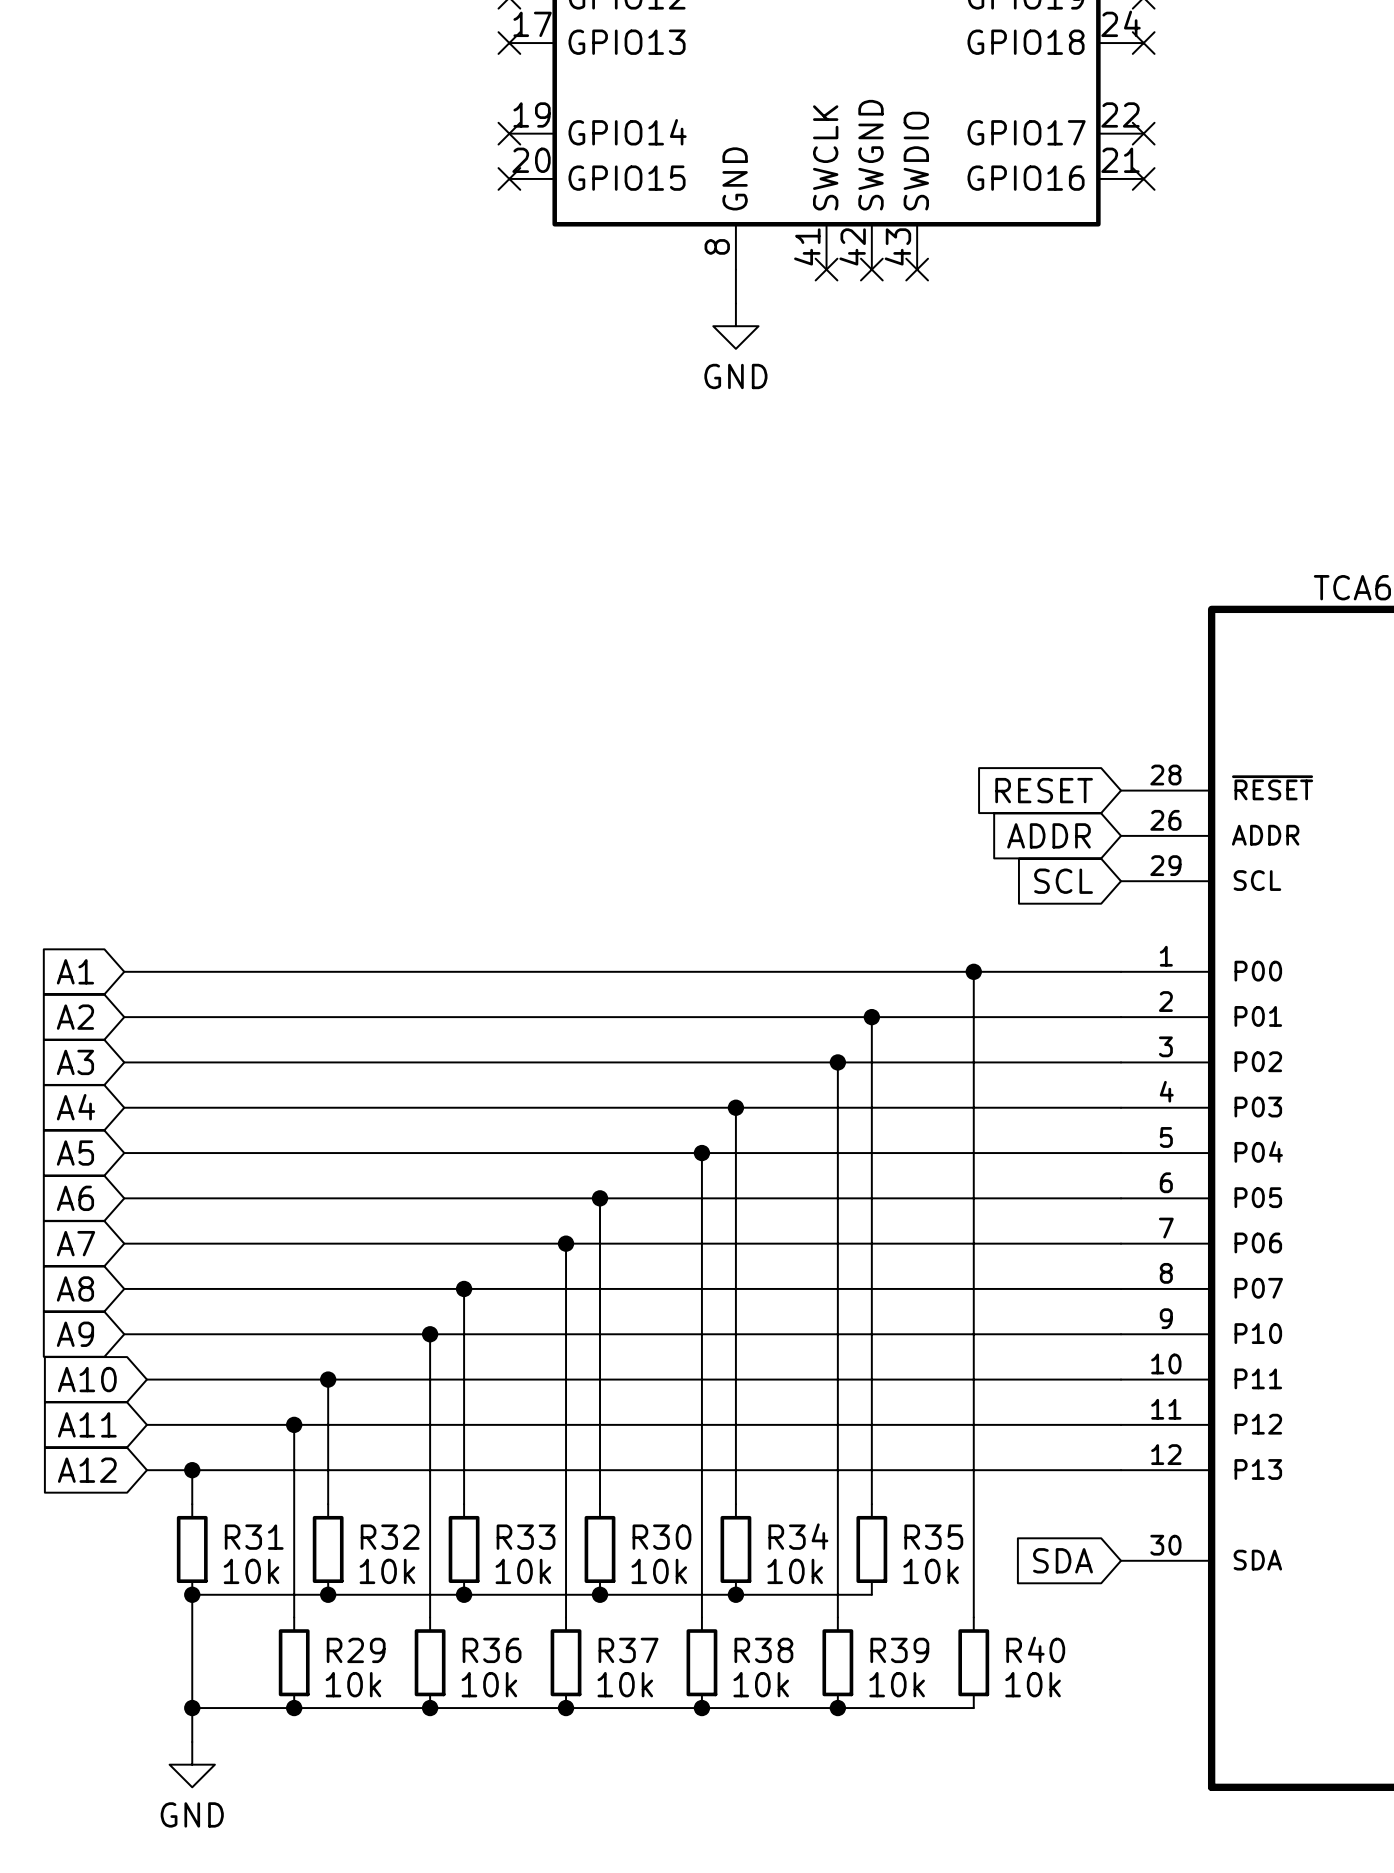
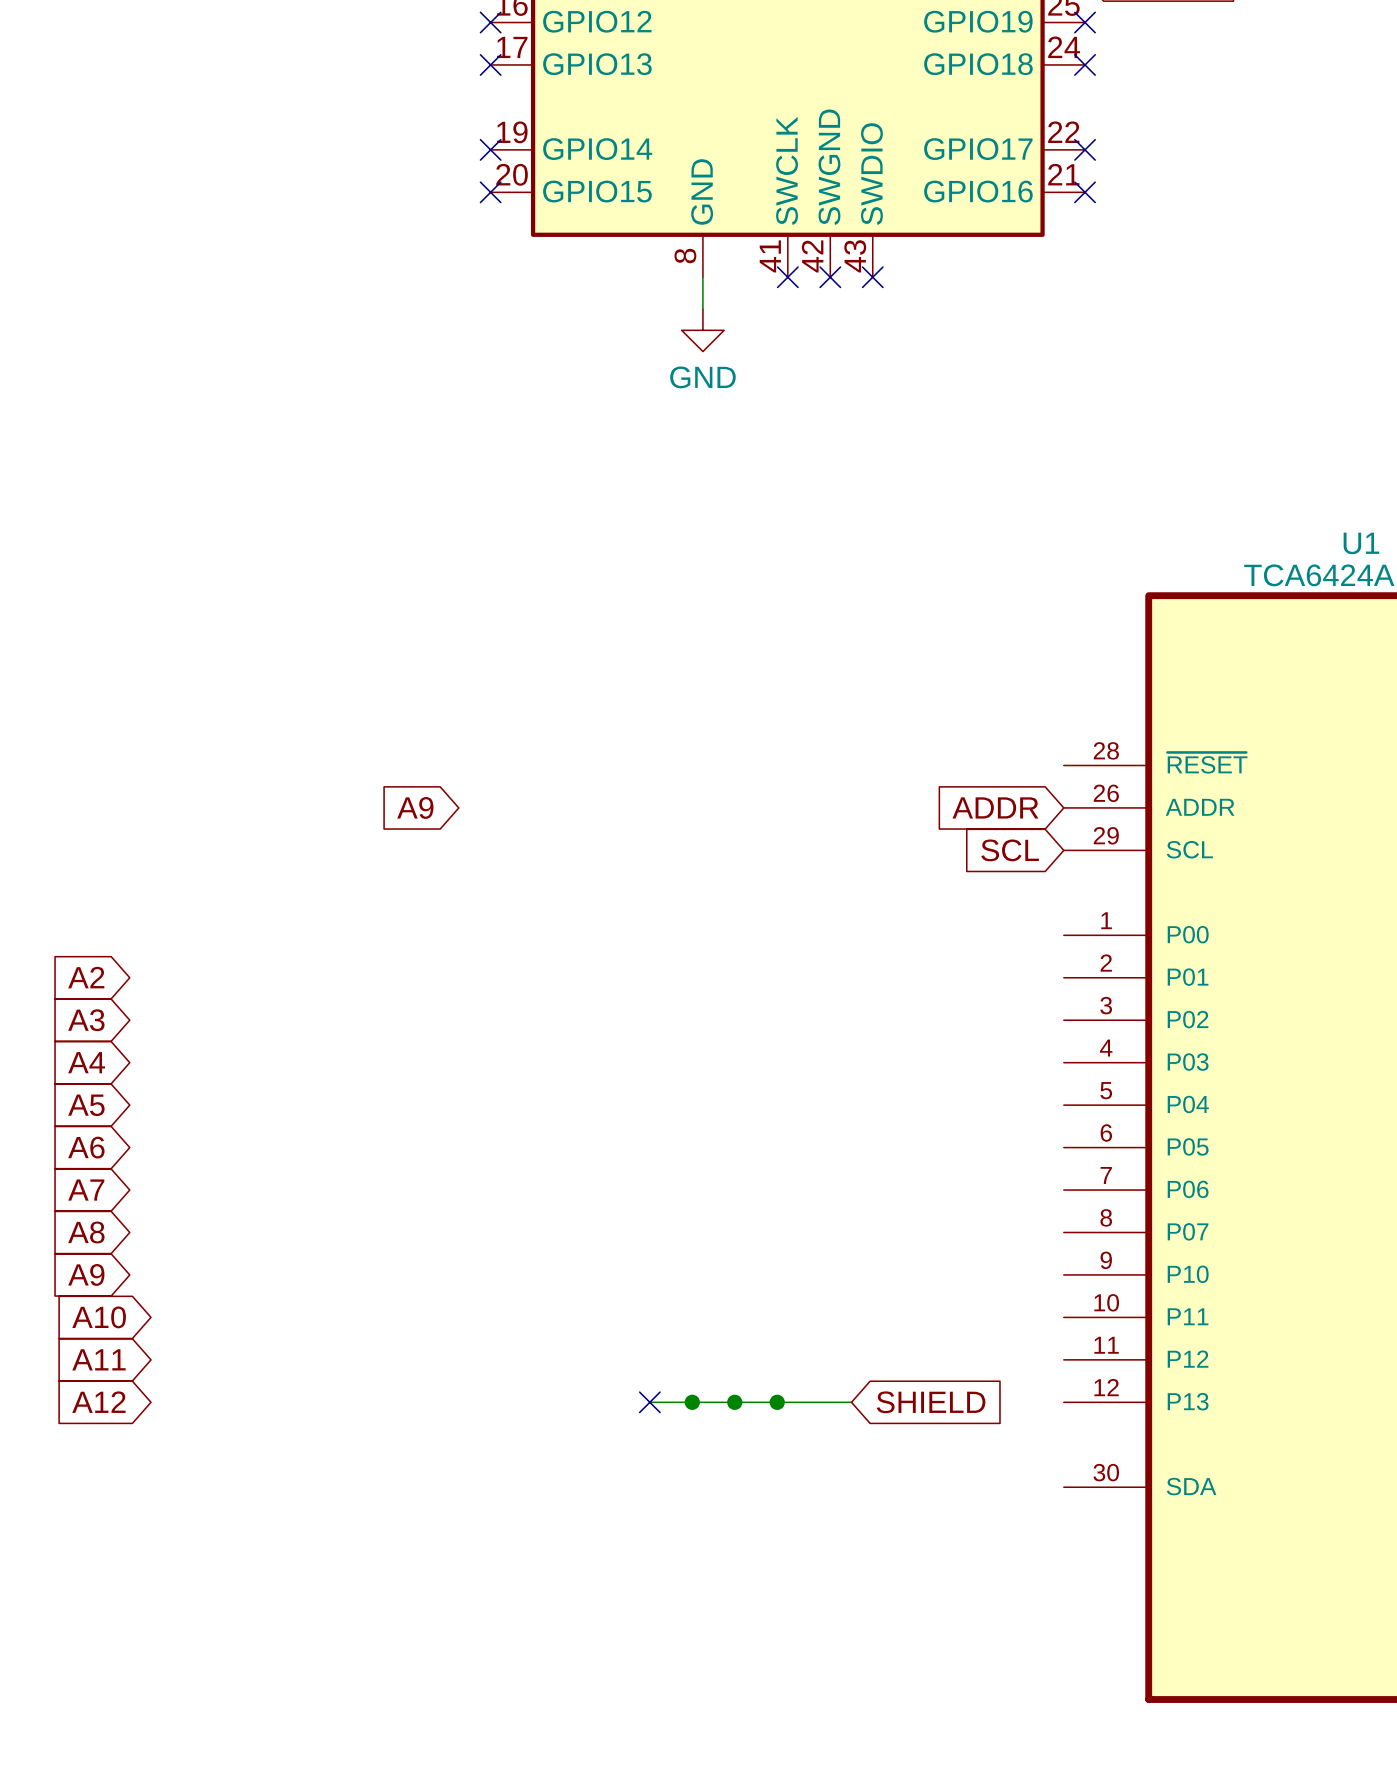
global label: RESET (1044, 790) -> none
global label: none -> A9 (415, 807)
global label: A1 (75, 971) -> none
wire: (124, 971) (1121, 971) -> none
wire: (973, 971) (973, 1617) -> none
junction: (973, 971) -> none
wire: (124, 1017) (1121, 1017) -> none
wire: (871, 1017) (871, 1504) -> none
junction: (871, 1017) -> none
wire: (124, 1062) (1121, 1062) -> none
wire: (837, 1062) (837, 1617) -> none
junction: (837, 1062) -> none
wire: (124, 1107) (1121, 1107) -> none
wire: (735, 1107) (735, 1504) -> none
junction: (735, 1107) -> none
wire: (124, 1153) (1121, 1153) -> none
wire: (701, 1153) (701, 1617) -> none
junction: (701, 1153) -> none
wire: (124, 1198) (1121, 1198) -> none
wire: (600, 1198) (600, 1504) -> none
junction: (600, 1198) -> none
wire: (124, 1243) (1121, 1243) -> none
wire: (566, 1243) (566, 1617) -> none
junction: (566, 1243) -> none
wire: (124, 1288) (1121, 1288) -> none
wire: (464, 1288) (464, 1504) -> none
junction: (464, 1288) -> none
wire: (124, 1334) (1121, 1334) -> none
wire: (430, 1334) (430, 1617) -> none
junction: (430, 1334) -> none
wire: (146, 1379) (1121, 1379) -> none
wire: (328, 1379) (328, 1504) -> none
junction: (328, 1379) -> none
wire: (146, 1424) (1121, 1424) -> none
wire: (294, 1424) (294, 1617) -> none
junction: (294, 1424) -> none
wire: (146, 1470) (679, 1470) -> none
wire: (192, 1470) (192, 1504) -> none
junction: (192, 1470) -> none
no-connect mark: none -> (649, 1402)
junction: none -> (692, 1402)
junction: none -> (734, 1402)
junction: none -> (777, 1402)
wire: (894, 1470) (1121, 1470) -> none
global label: none -> SHIELD (931, 1402)
R31: 10k (192, 1549) -> none
R32: 10k (328, 1549) -> none
R33: 10k (464, 1549) -> none
R30: 10k (600, 1549) -> none
R34: 10k (735, 1549) -> none
R35: 10k (871, 1549) -> none
global label: SDA (1063, 1560) -> none
junction: (192, 1594) -> none
junction: (328, 1594) -> none
junction: (464, 1594) -> none
junction: (600, 1594) -> none
junction: (735, 1594) -> none
wire: (871, 1594) (192, 1594) (192, 1742) -> none
R29: 10k (294, 1662) -> none
R36: 10k (430, 1662) -> none
R37: 10k (566, 1662) -> none
R38: 10k (701, 1662) -> none
R39: 10k (837, 1662) -> none
R40: 10k (973, 1662) -> none
wire: (192, 1708) (973, 1708) -> none
junction: (192, 1708) -> none
junction: (294, 1708) -> none
junction: (430, 1708) -> none
junction: (566, 1708) -> none
junction: (701, 1708) -> none
junction: (837, 1708) -> none
power symbol: GND (192, 1764) -> none

